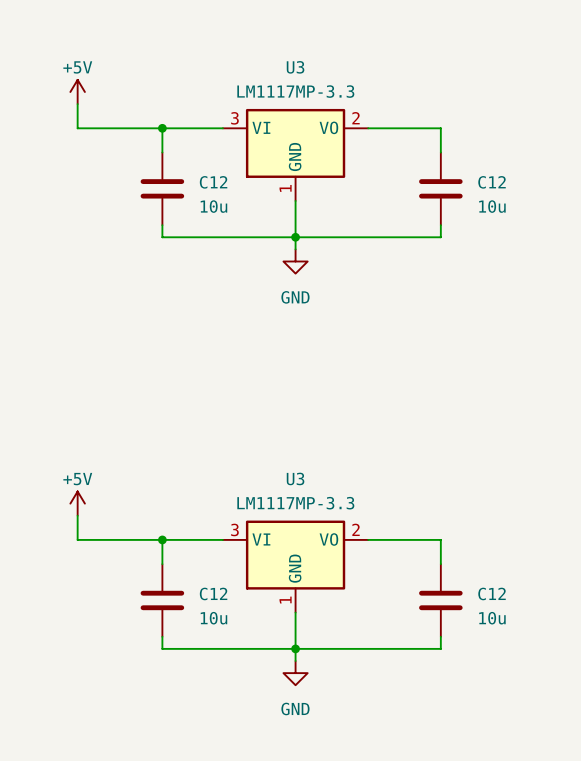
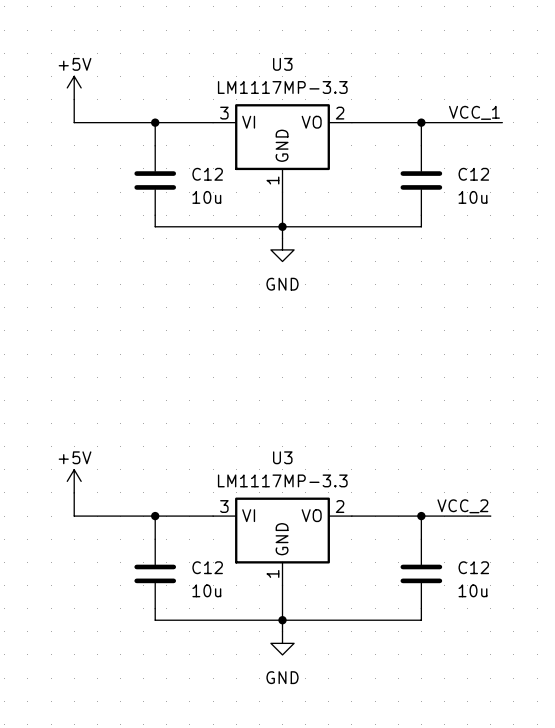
label: none -> VCC_1 (474, 112)
wire: none -> (421, 122) (502, 122)
junction: none -> (421, 122)
label: none -> VCC_2 (462, 506)
wire: none -> (421, 516) (490, 516)
junction: none -> (421, 516)

